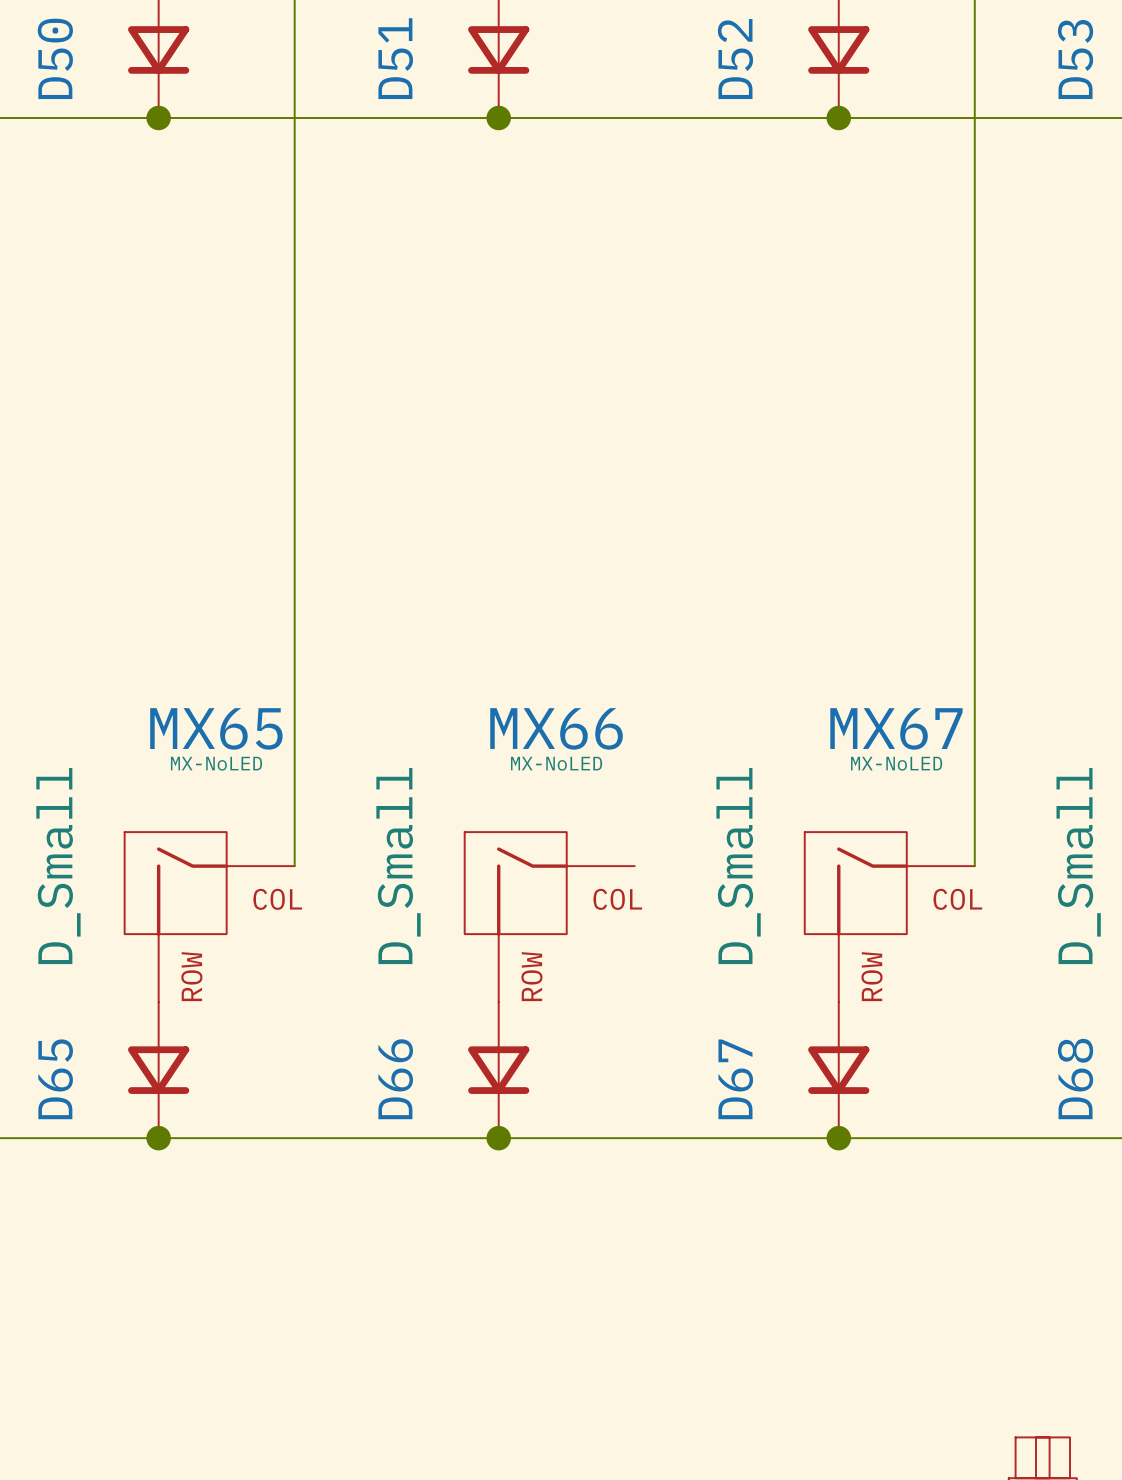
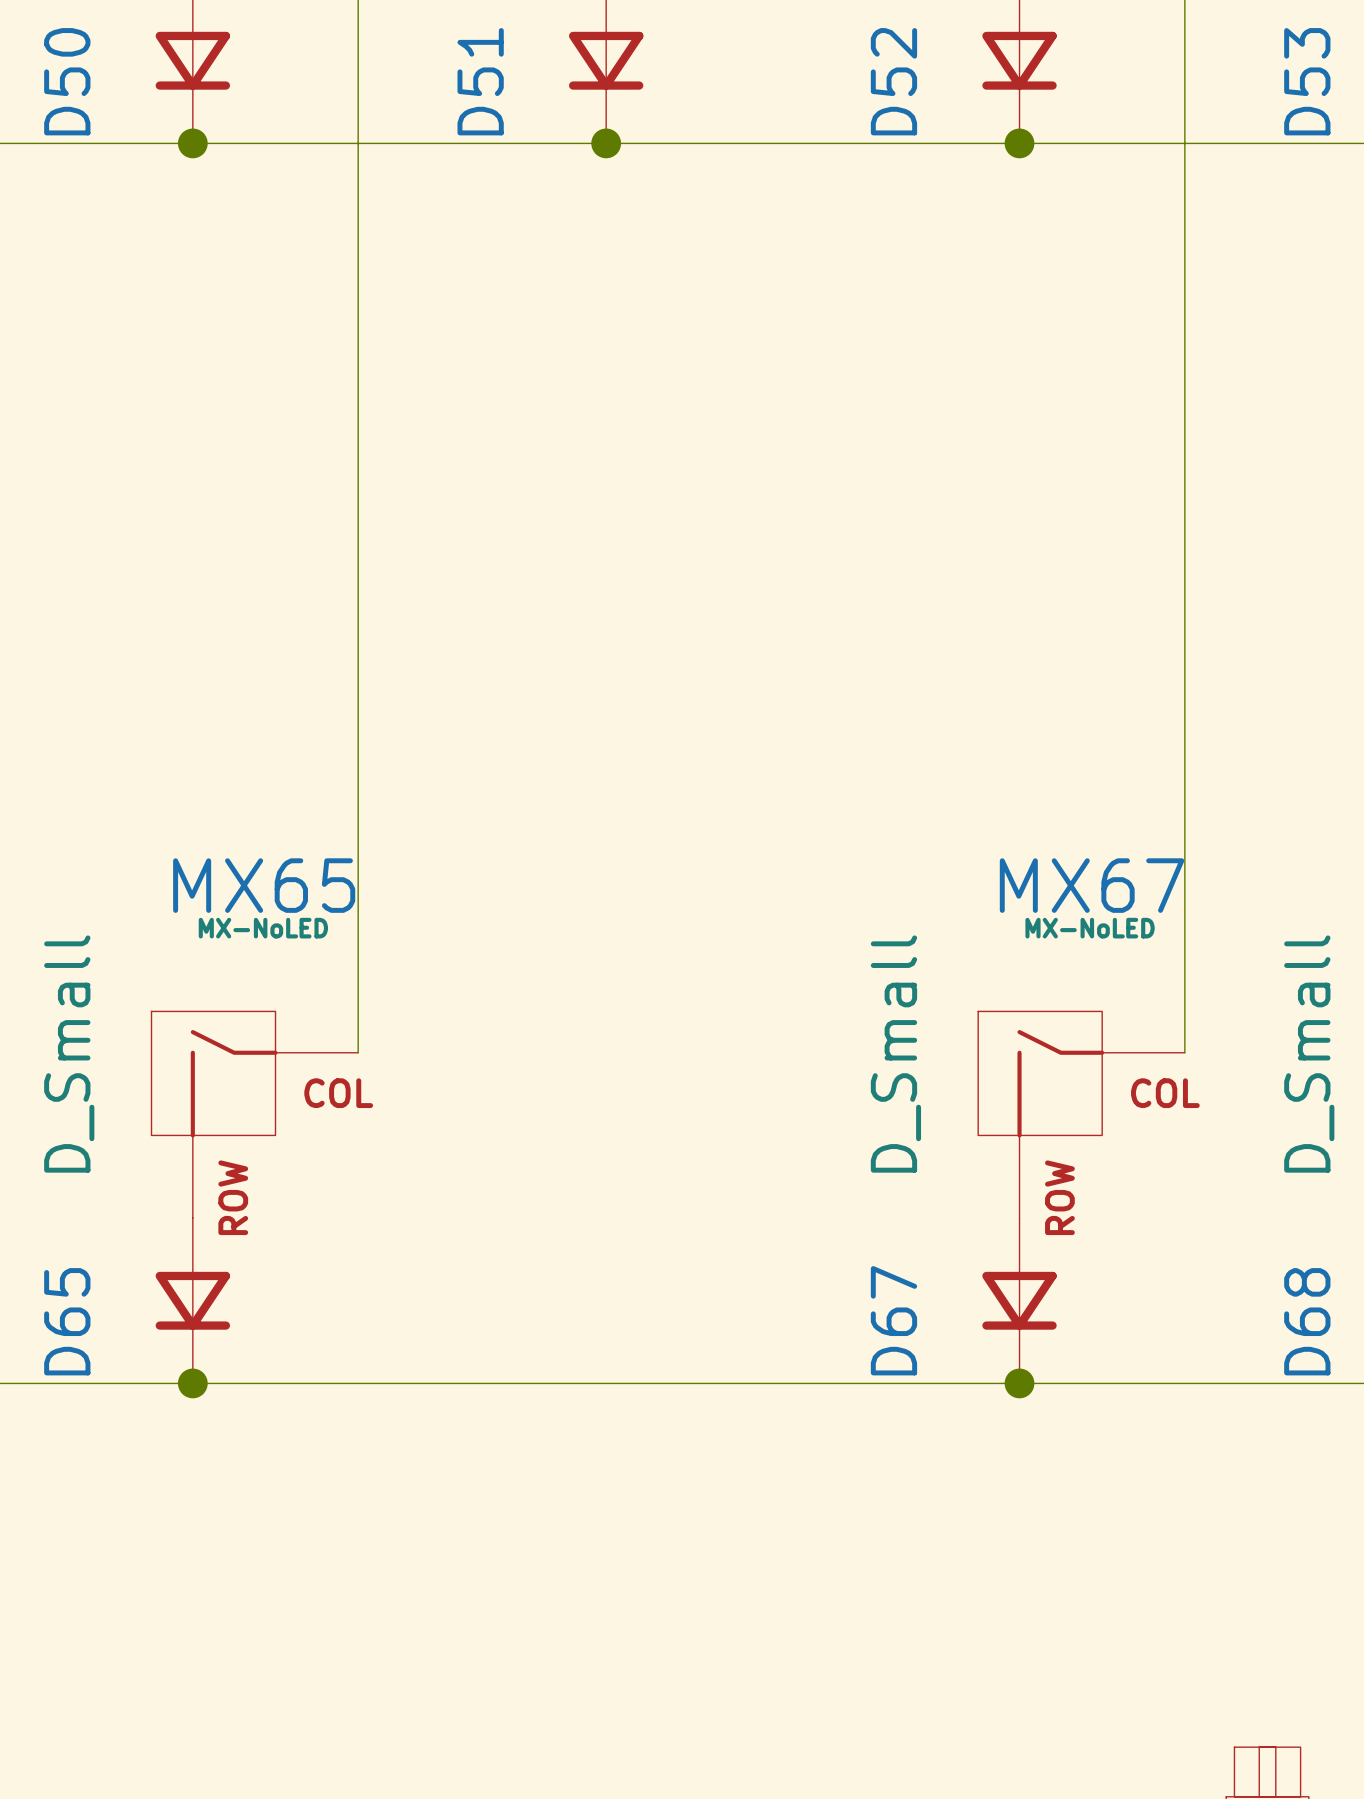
MX66: MX-NoLED (549, 917) -> none
D66: D_Small (498, 1070) -> none
junction: (498, 1138) -> none

